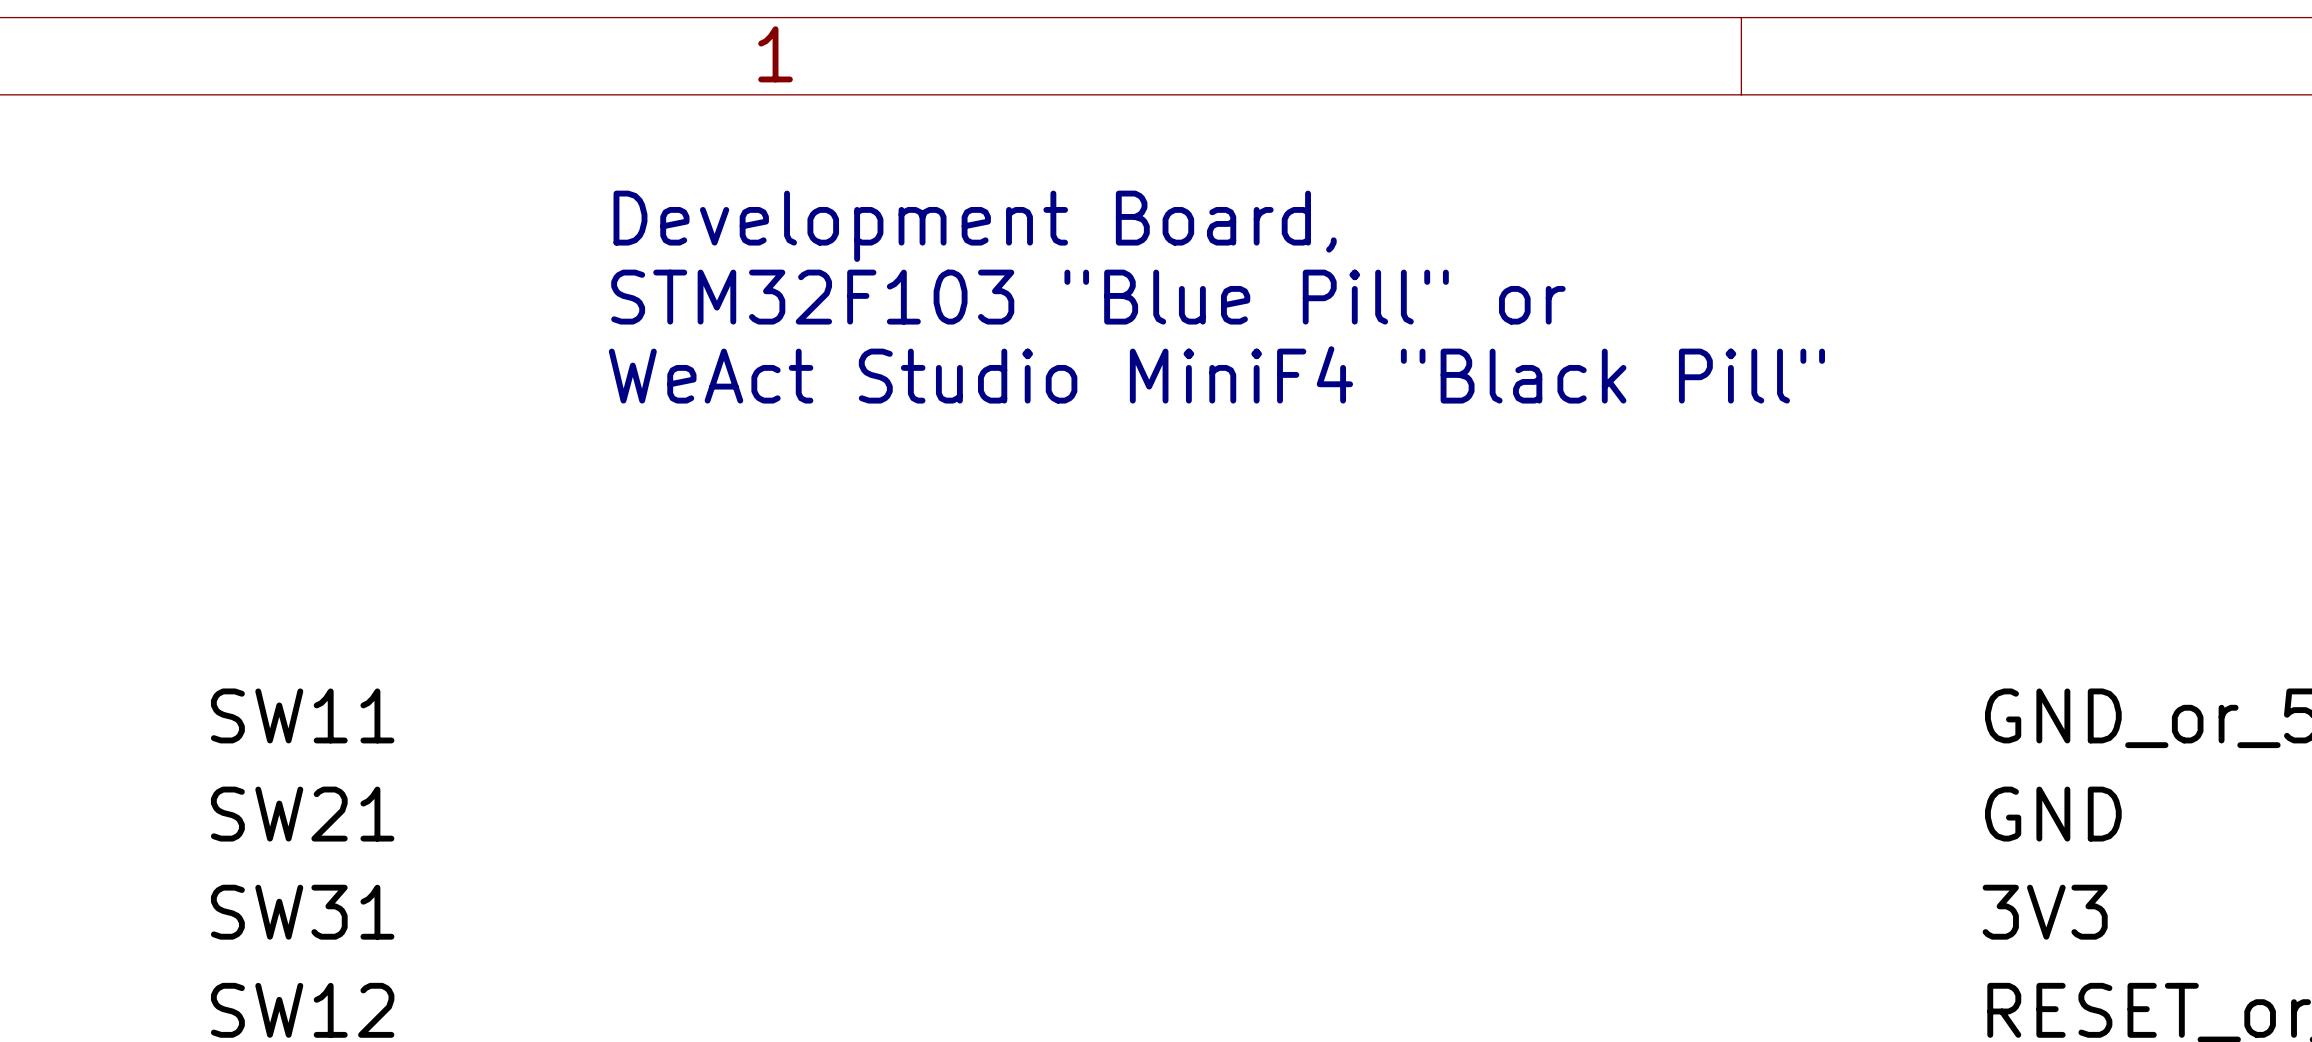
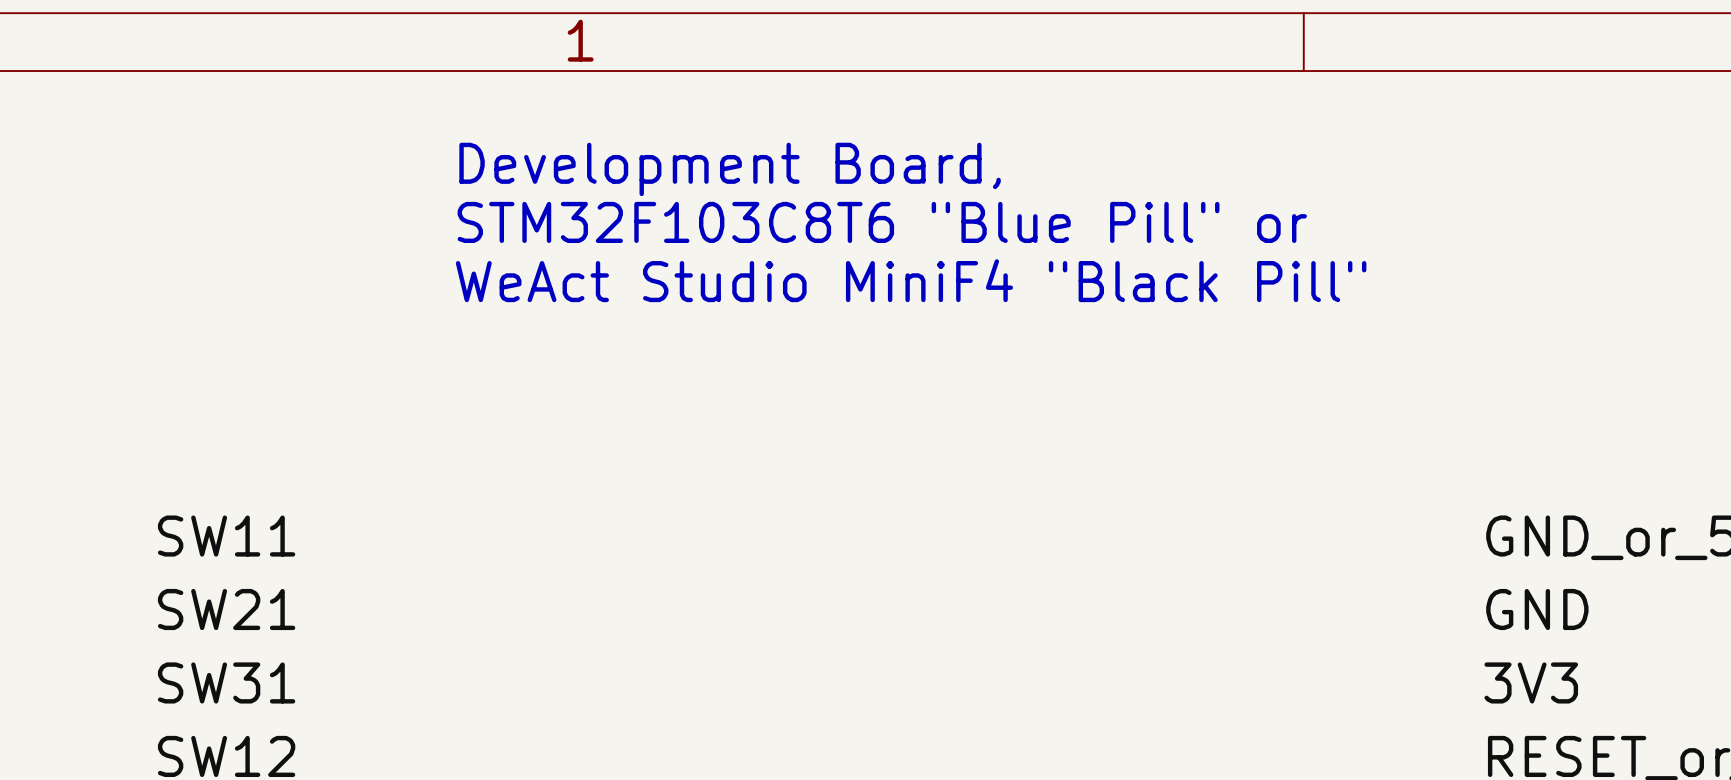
text: STM32F103 "Blue Pill" or (1088, 297) -> STM32F103C8T6 "Blue Pill" or (882, 222)

